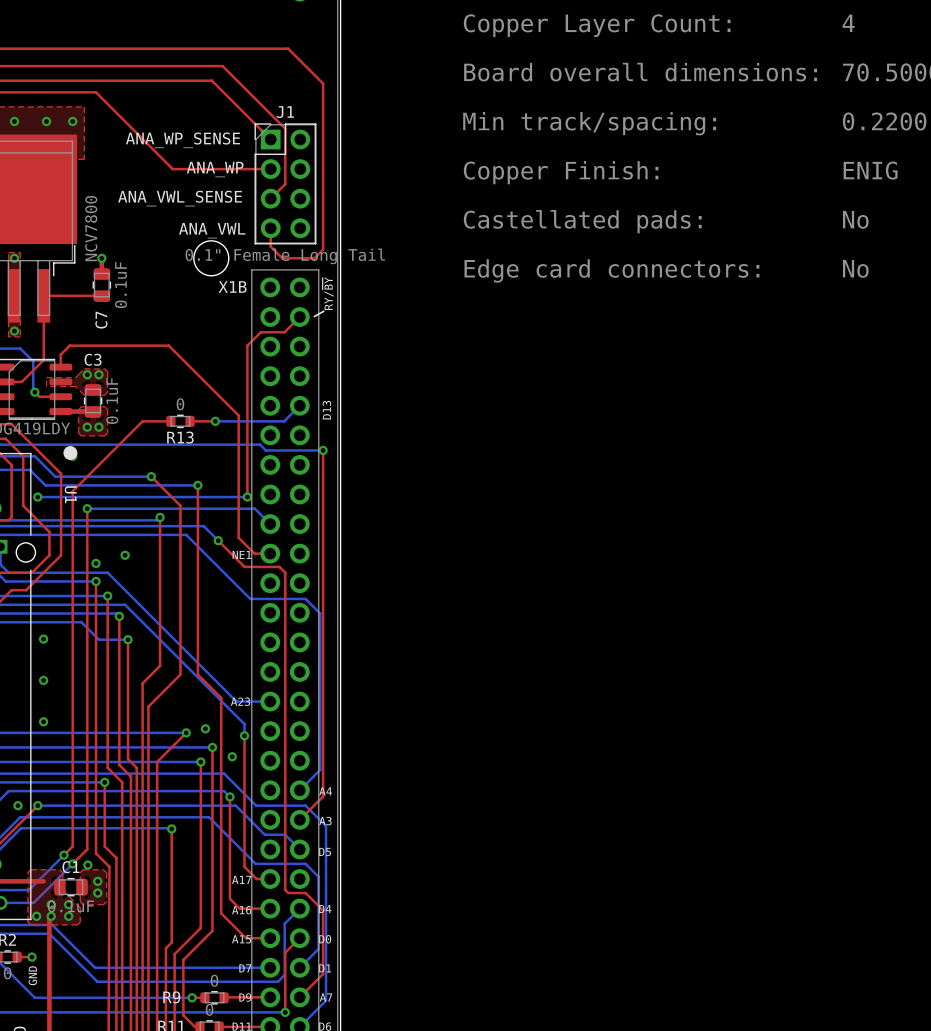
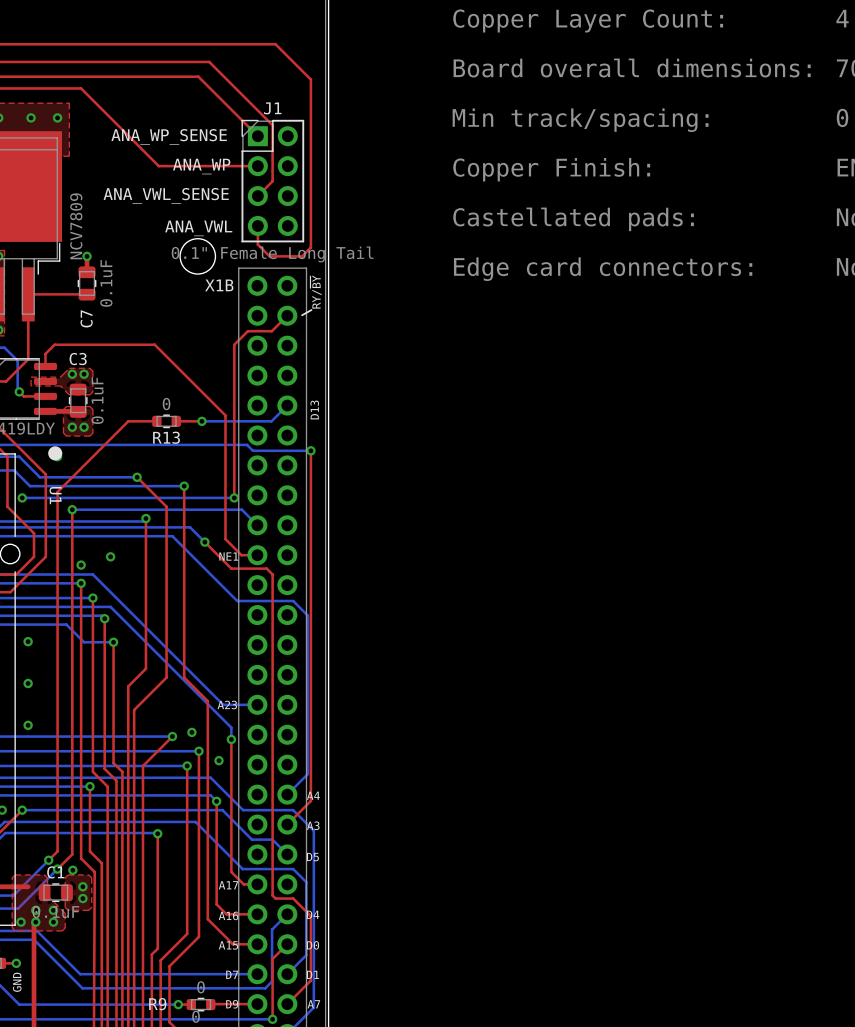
part value: NCV7800 (91, 228) -> NCV7809 (76, 226)

